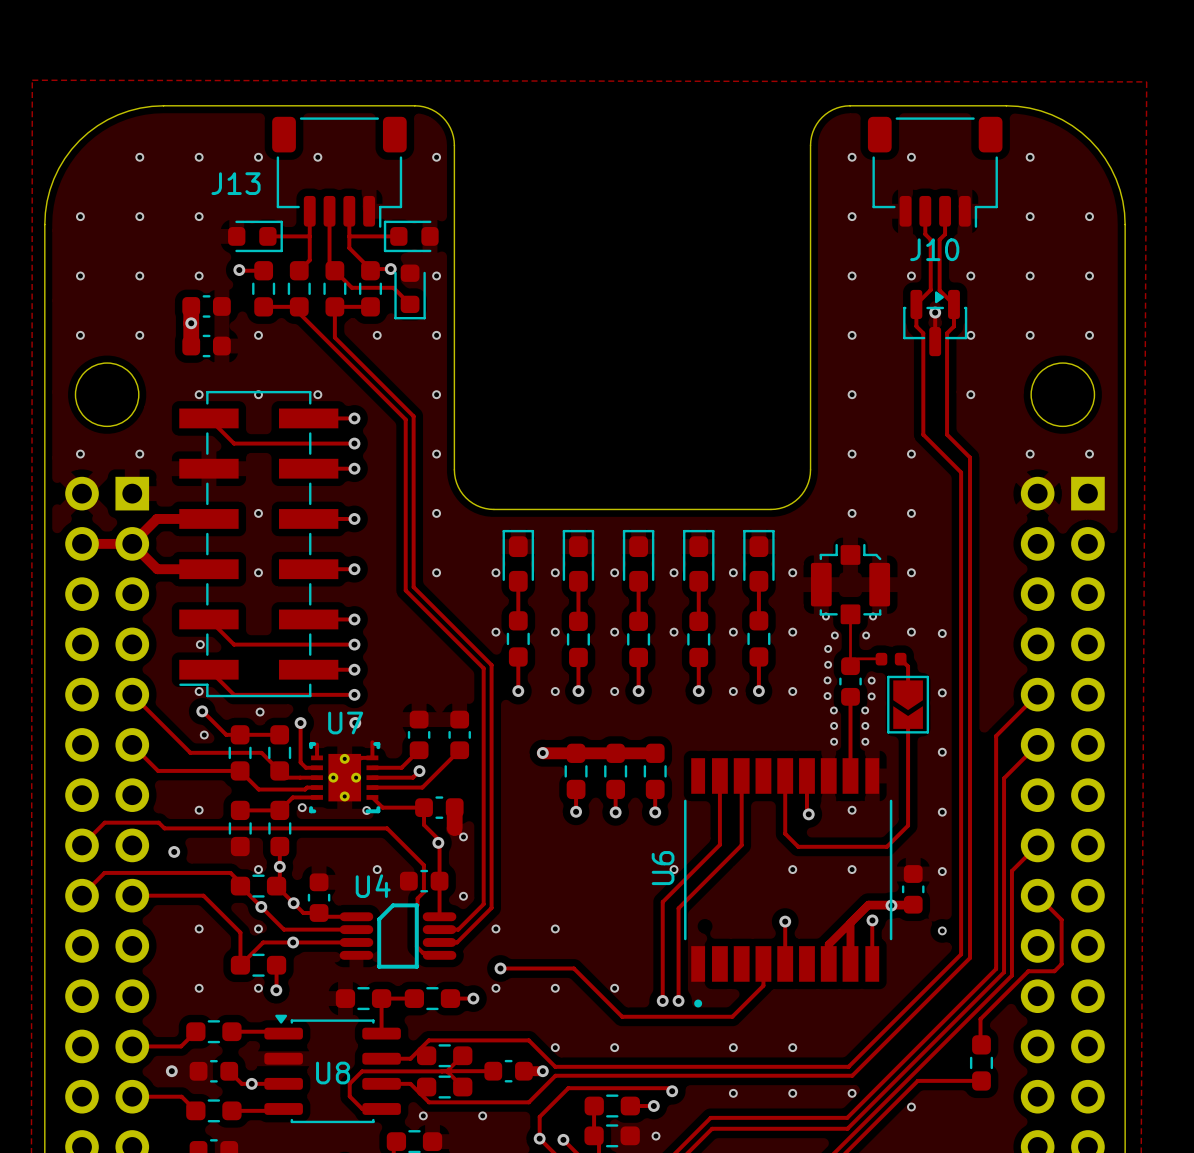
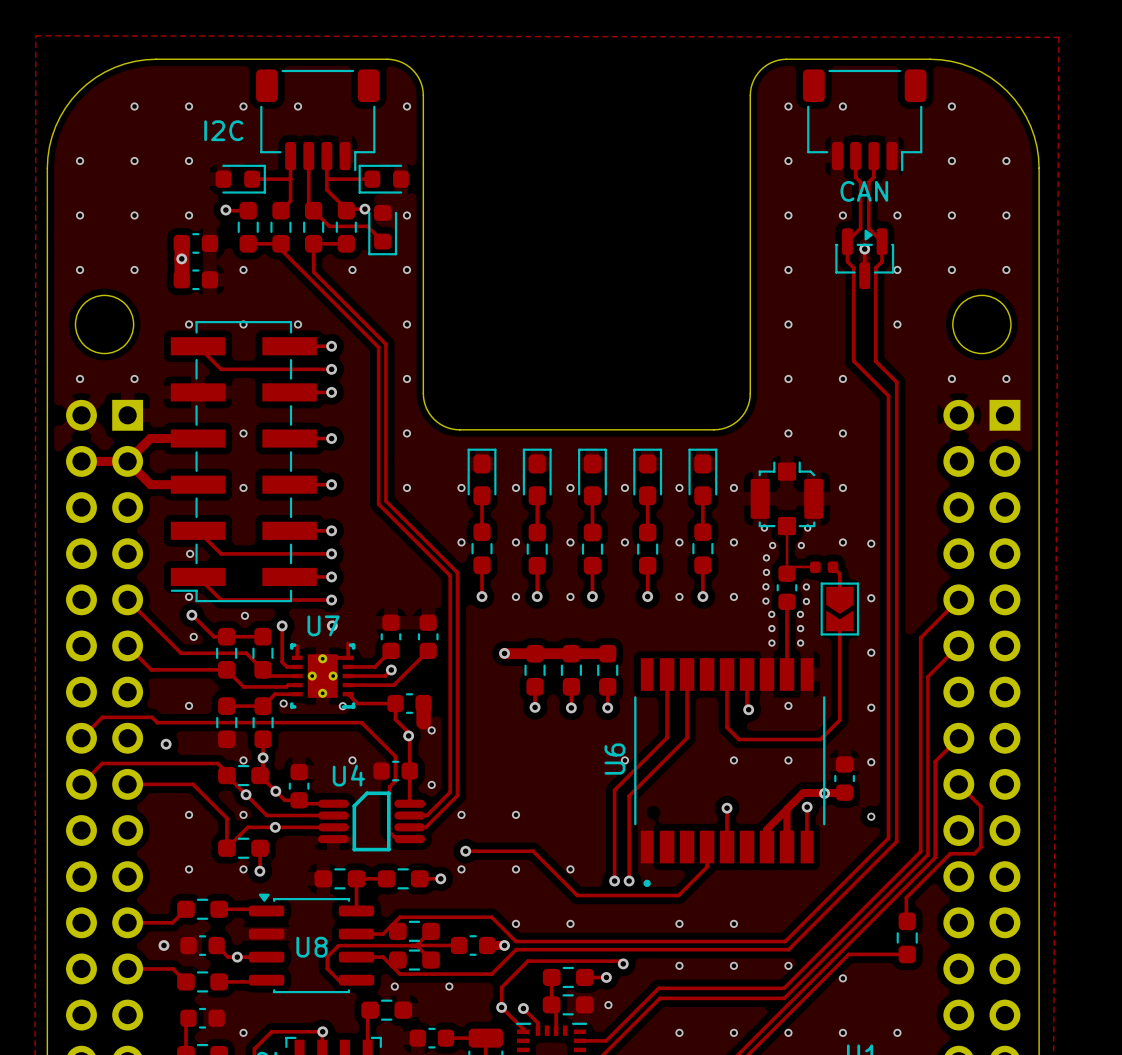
J13 name: J13 (236, 183) -> I2C (223, 130)
J10 name: J10 (934, 249) -> CAN (864, 191)

